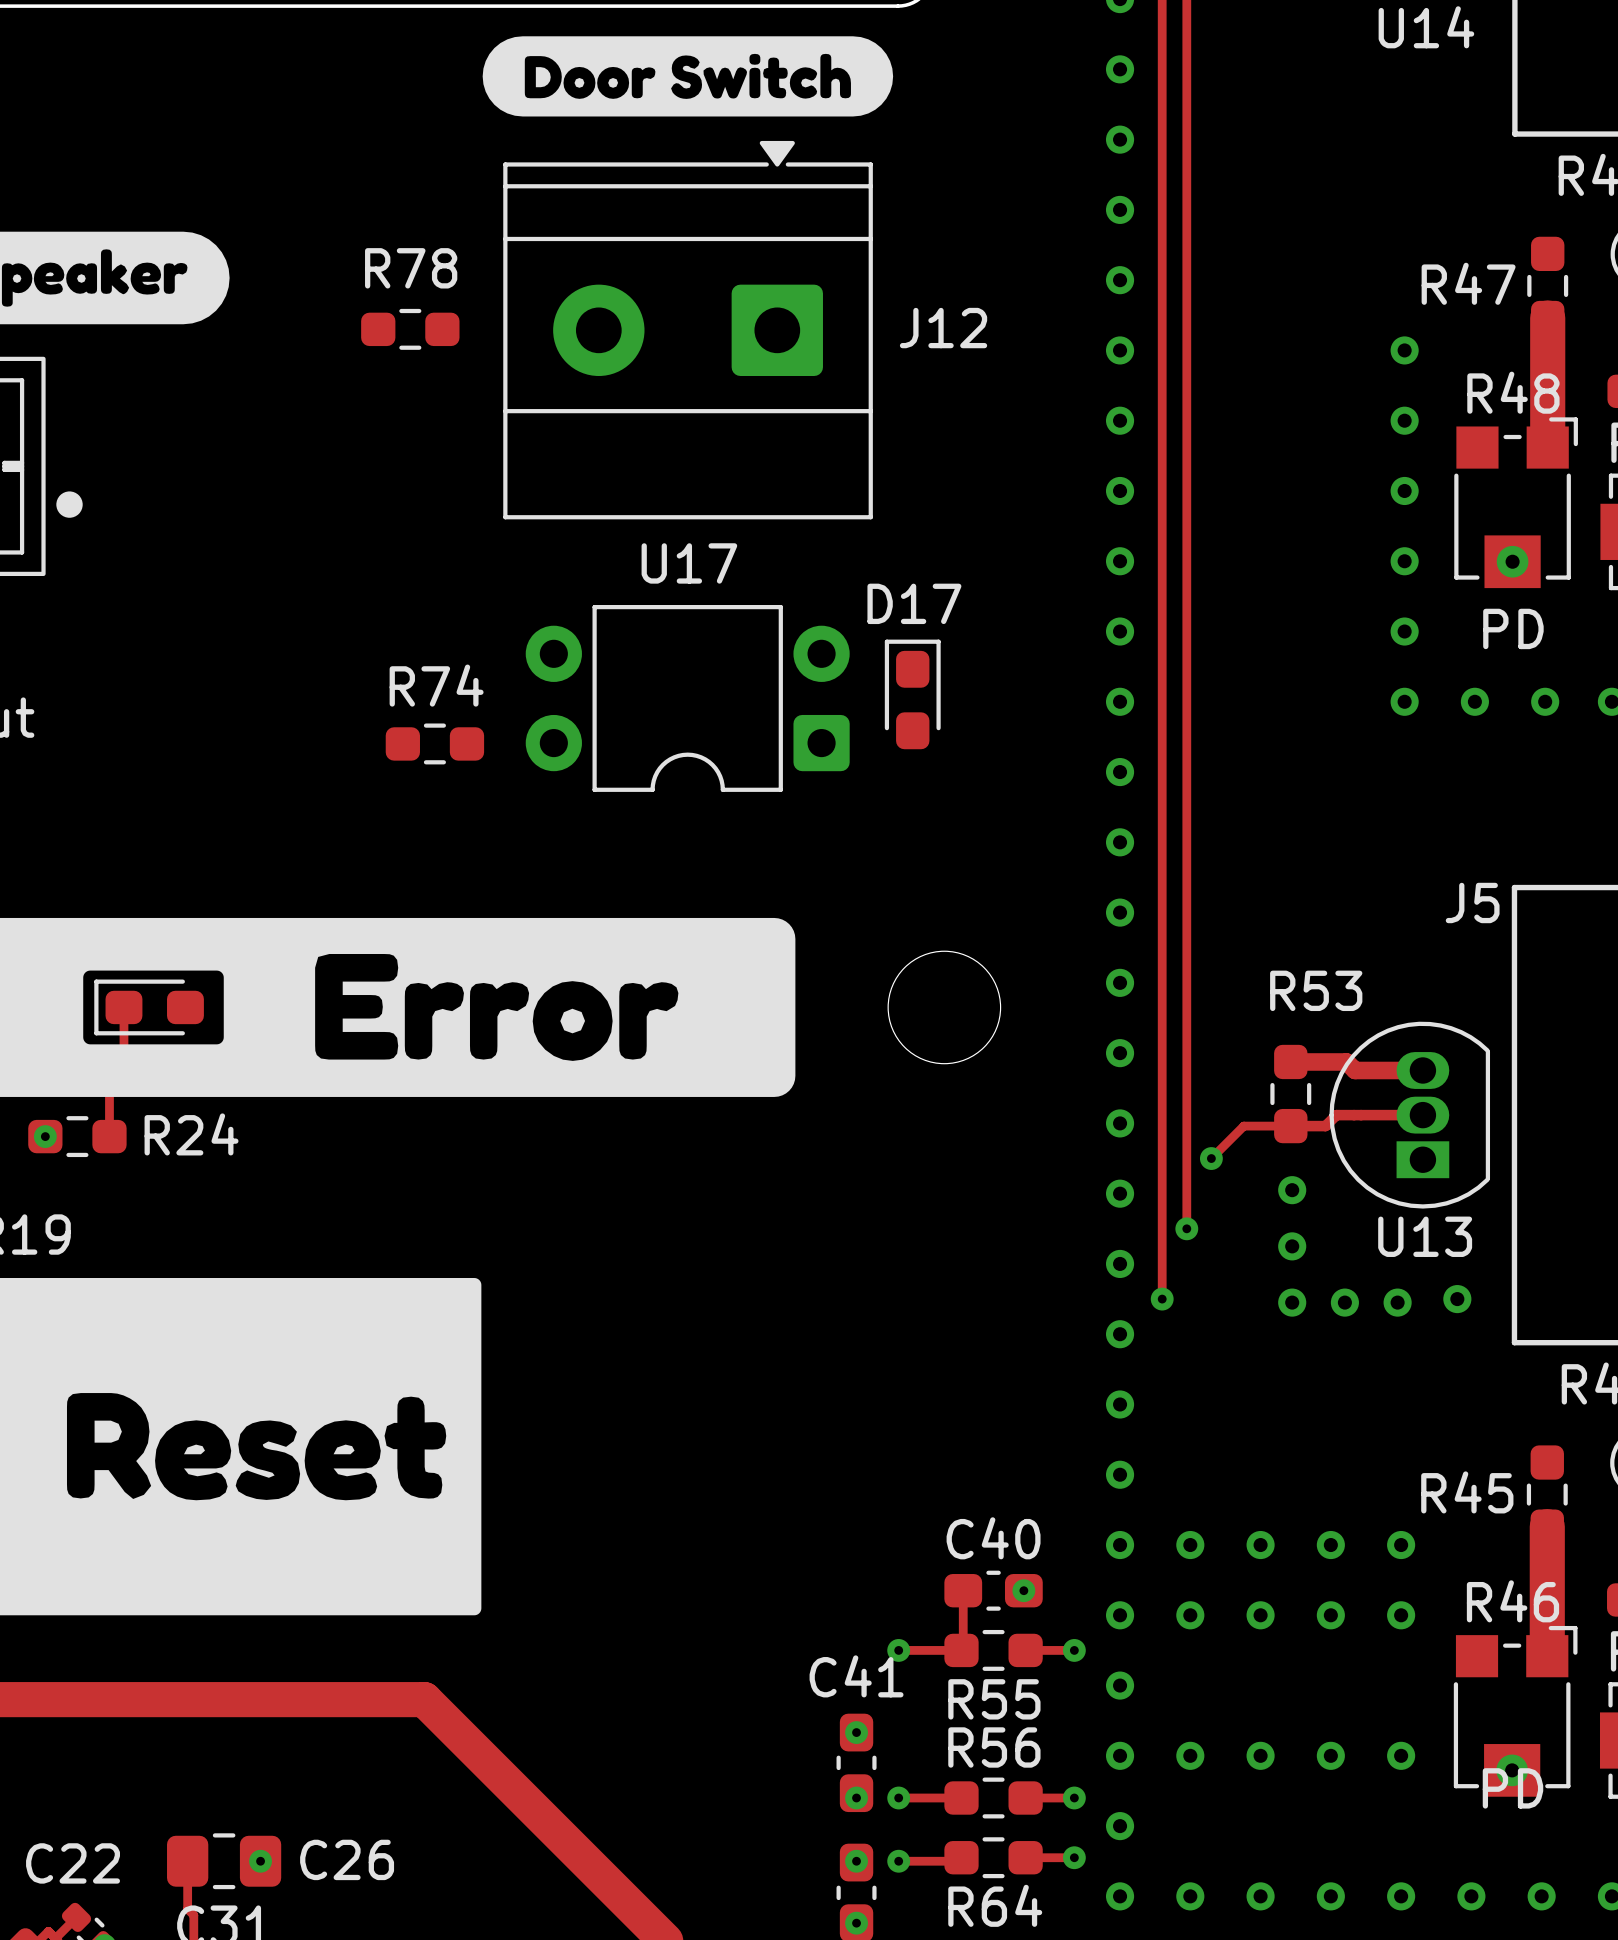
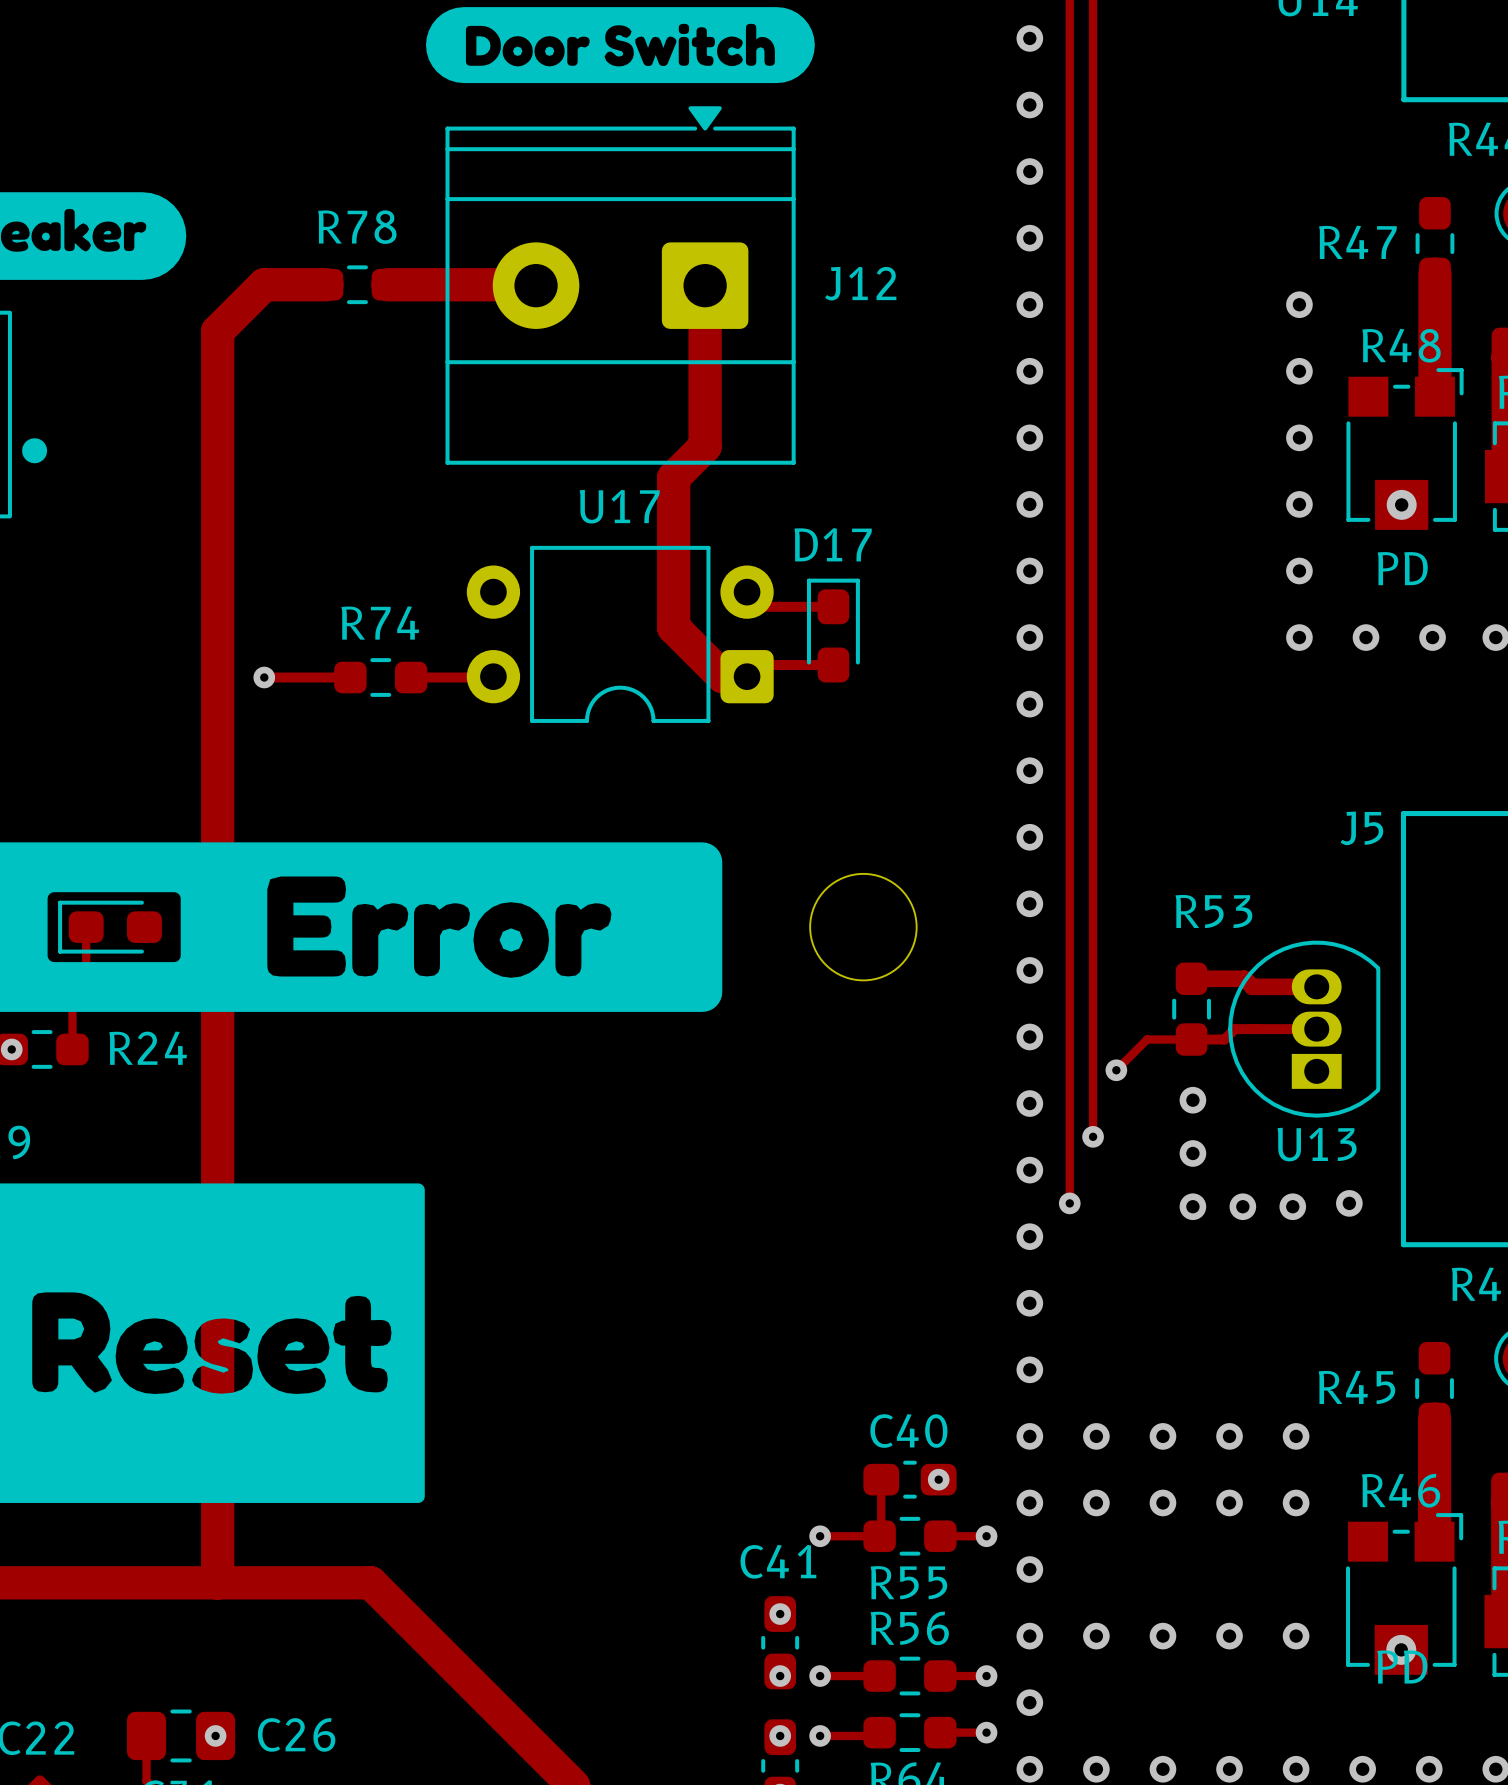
track: none -> (327, 284) (264, 284) (217, 331) (217, 1582)
track: none -> (387, 284) (536, 285)
track: none -> (705, 285) (705, 446) (673, 477) (673, 627) (722, 676) (747, 676) (758, 665) (833, 665)
track: none -> (747, 592) (761, 606) (833, 606)
track: none -> (264, 677) (350, 677)
via: none -> (264, 677)
track: none -> (493, 676) (411, 677)

